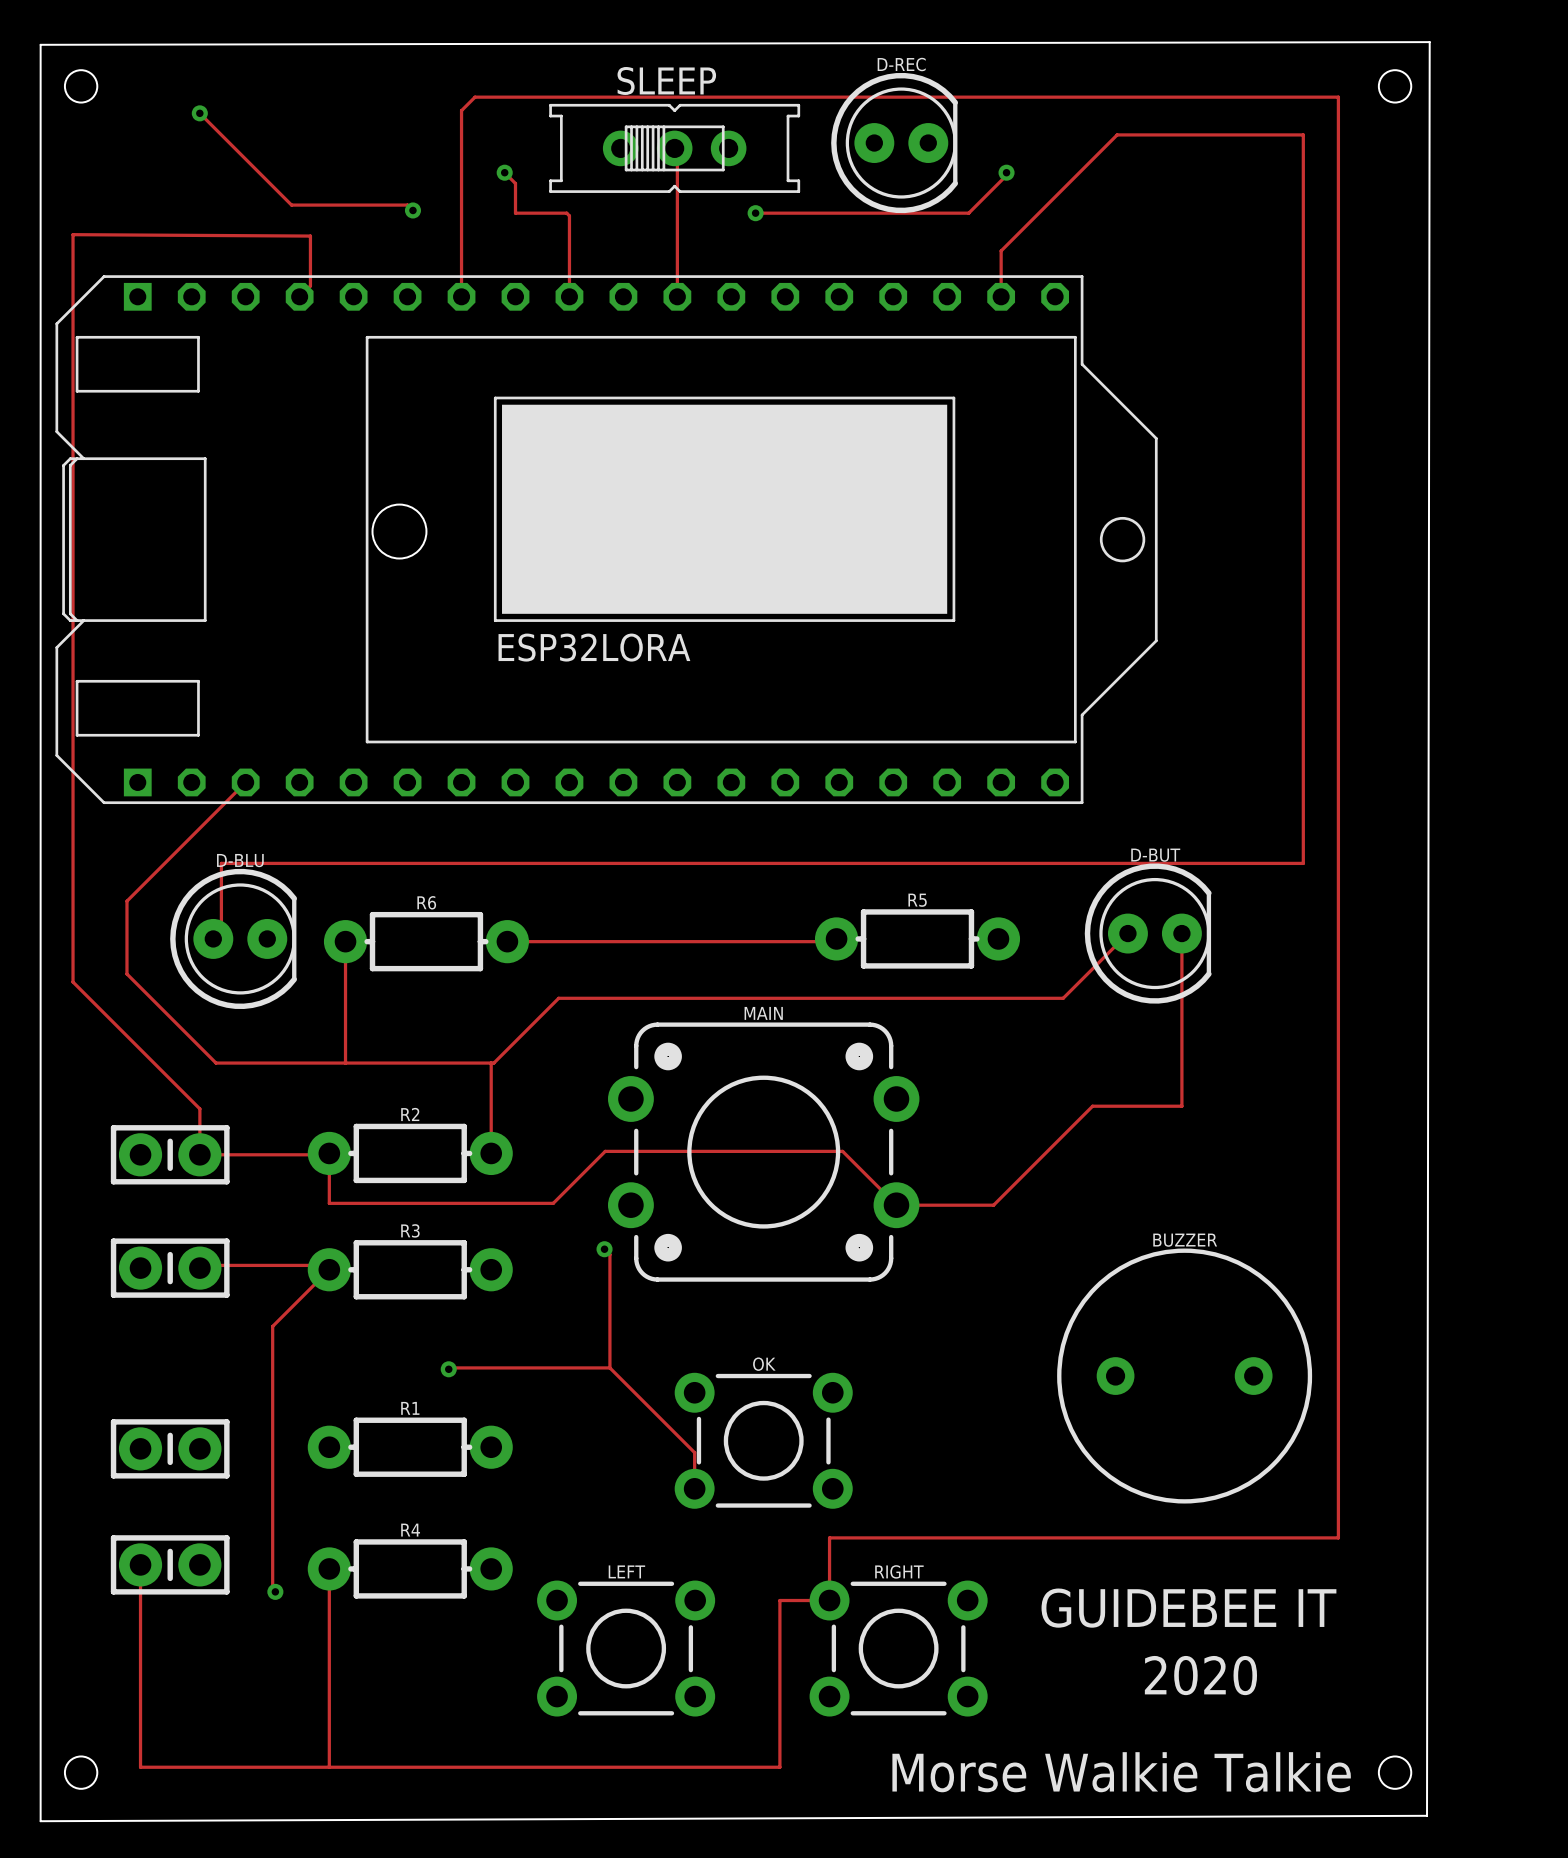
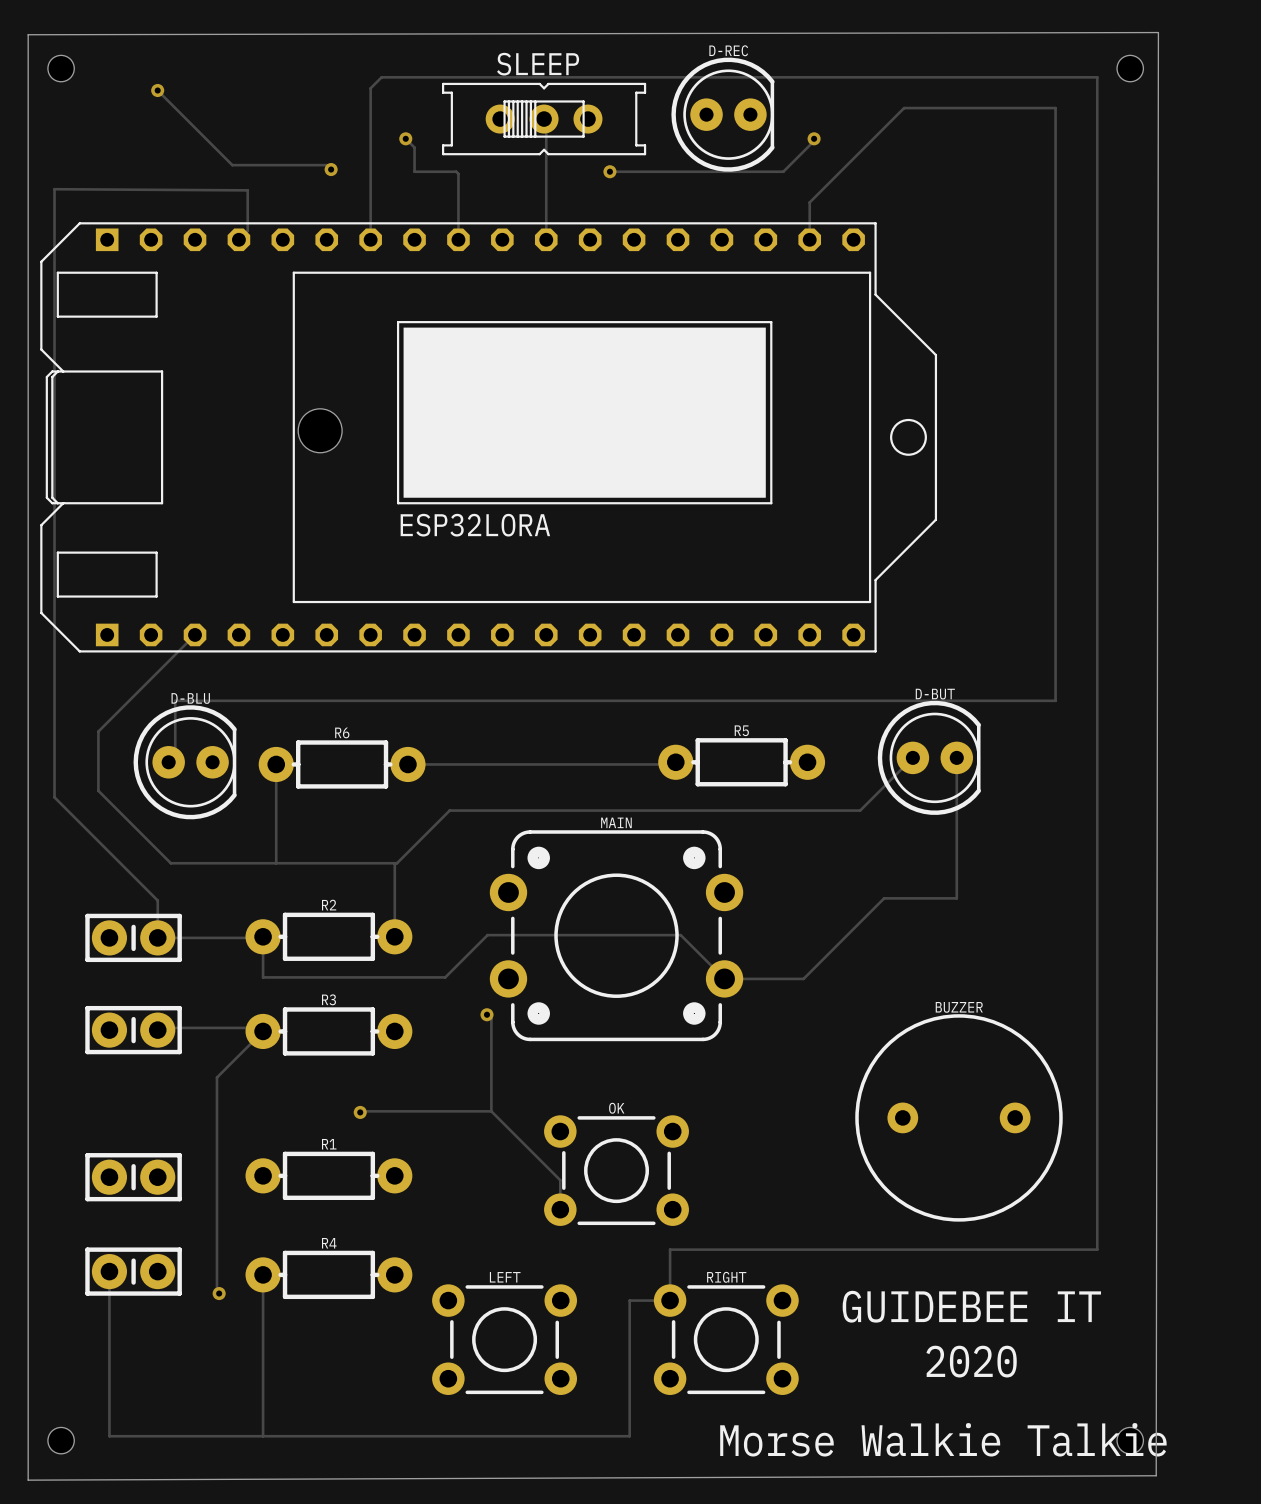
track: (1338, 97) (1338, 1537) -> (1084, 77) (1097, 77) (1097, 1249) (1084, 1249)

